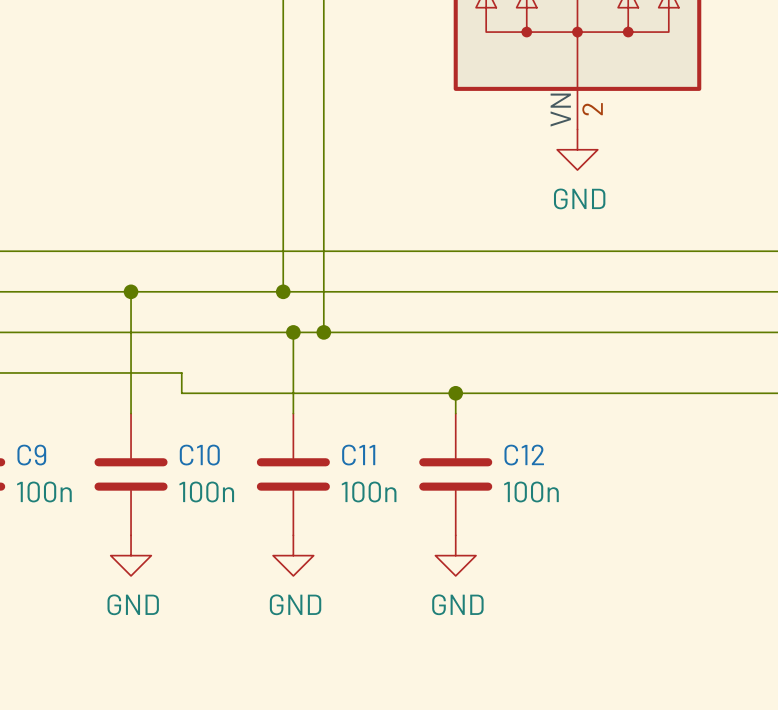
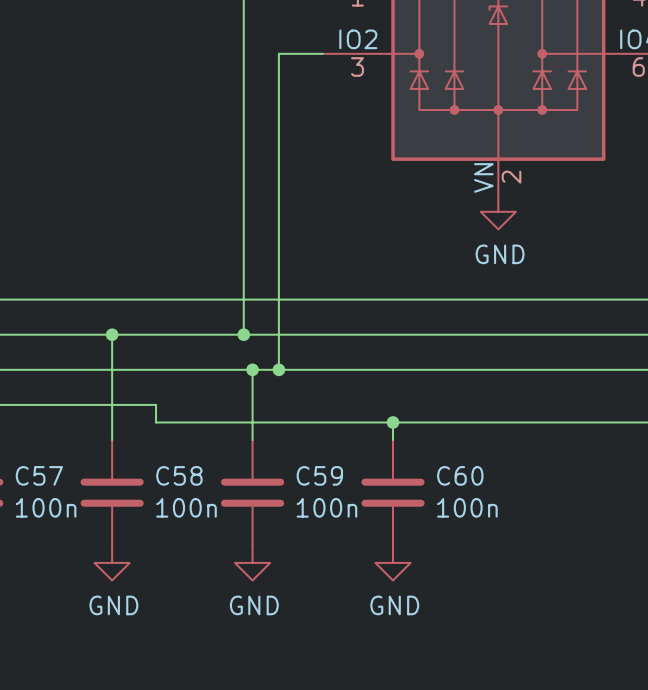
C9 name: C9 (31, 455) -> C57 (39, 475)
C10 name: C10 (199, 455) -> C58 (179, 475)
C11 name: C11 (358, 455) -> C59 (319, 475)
C12 name: C12 (524, 455) -> C60 (460, 475)

